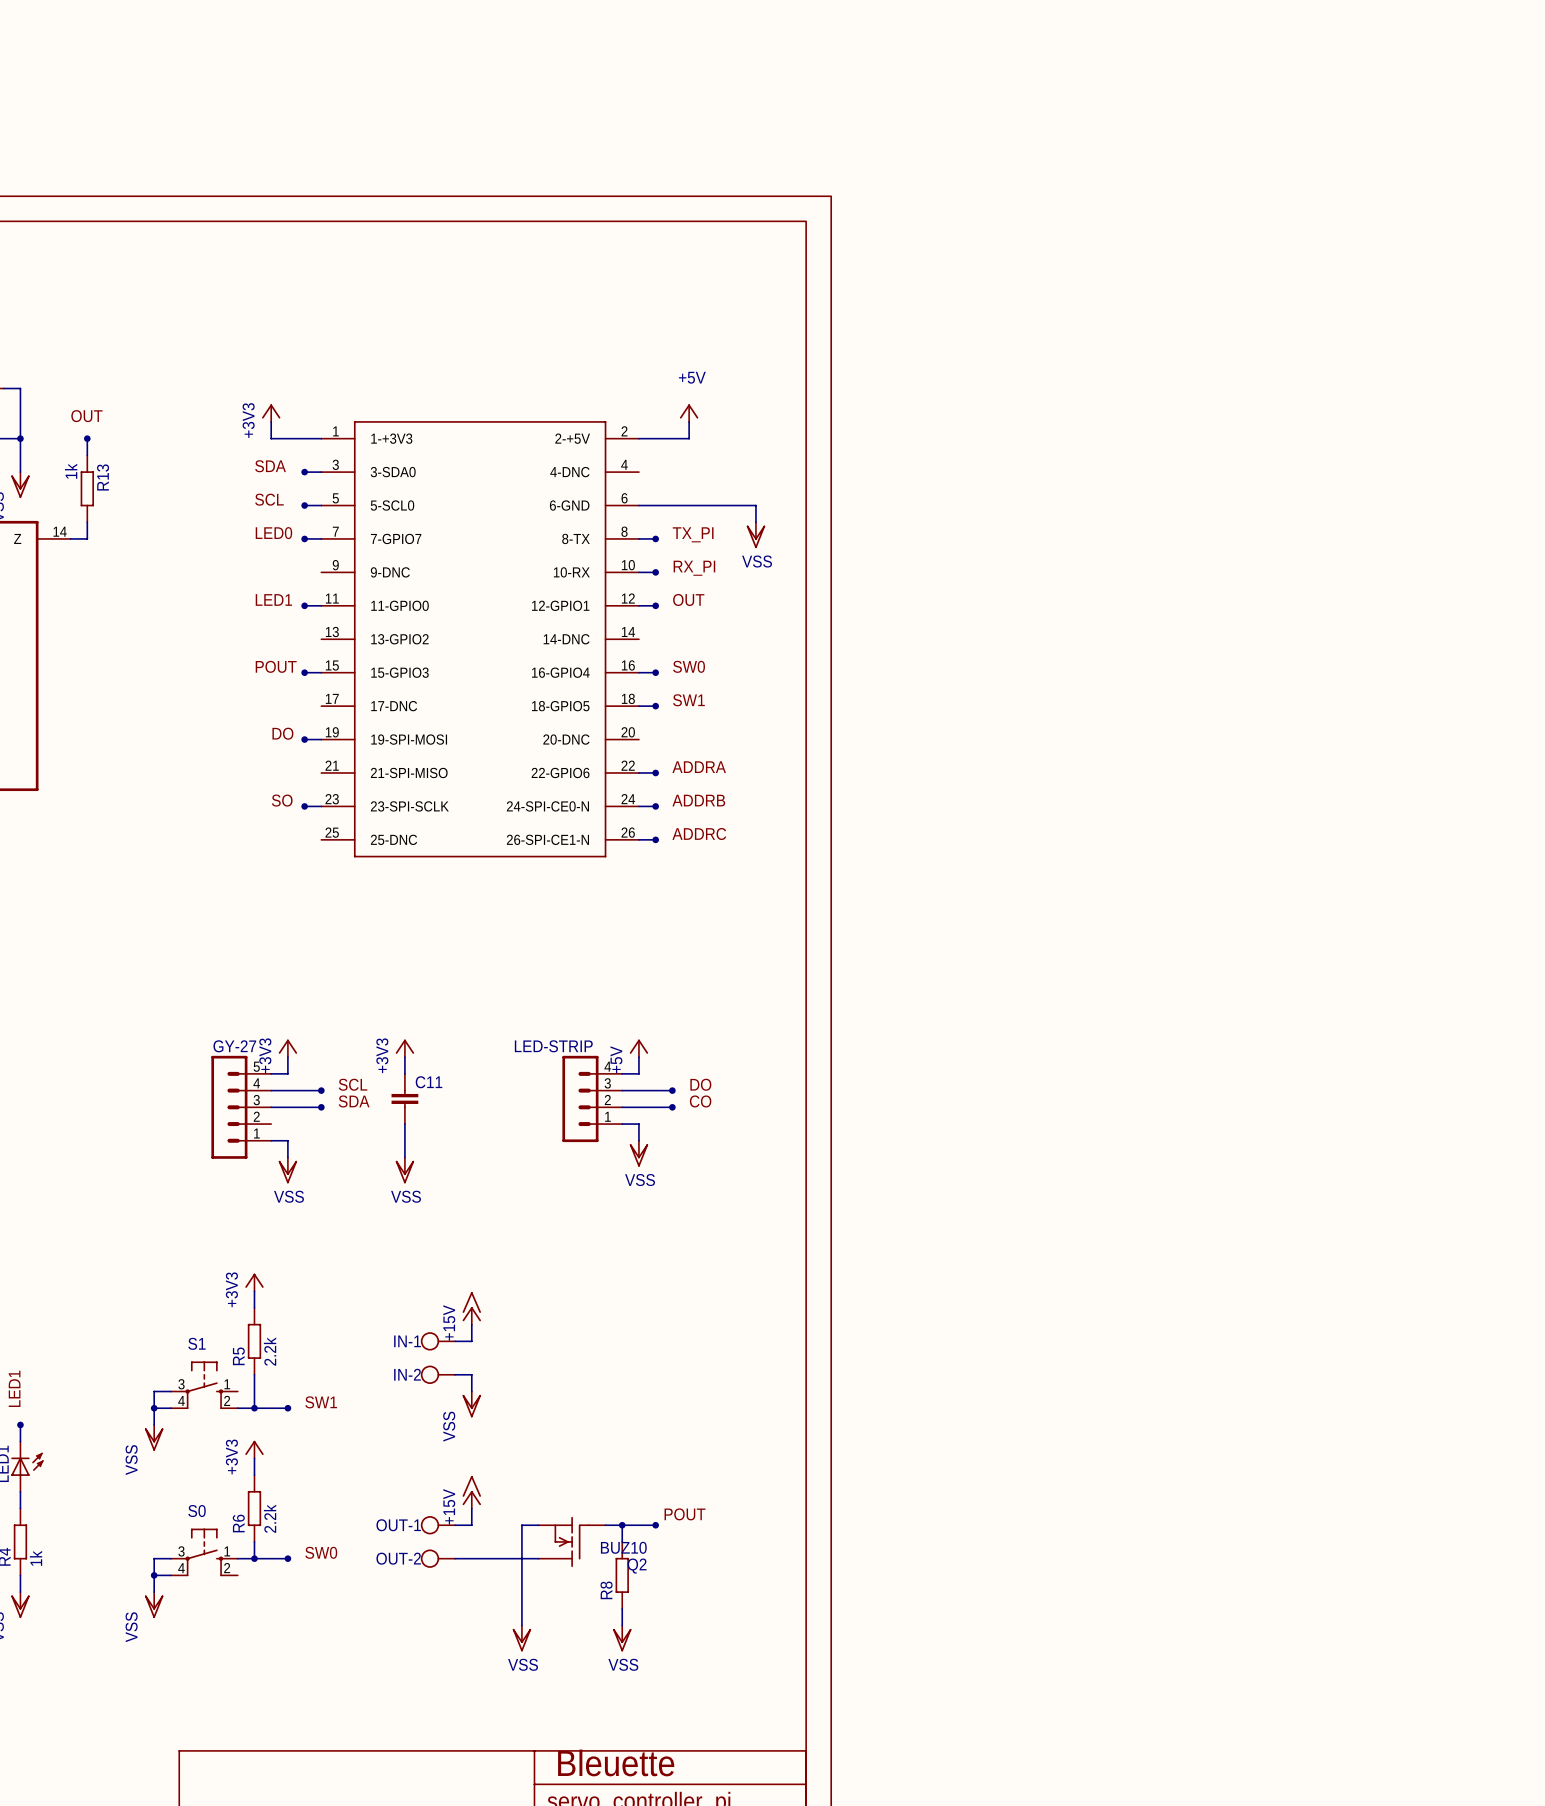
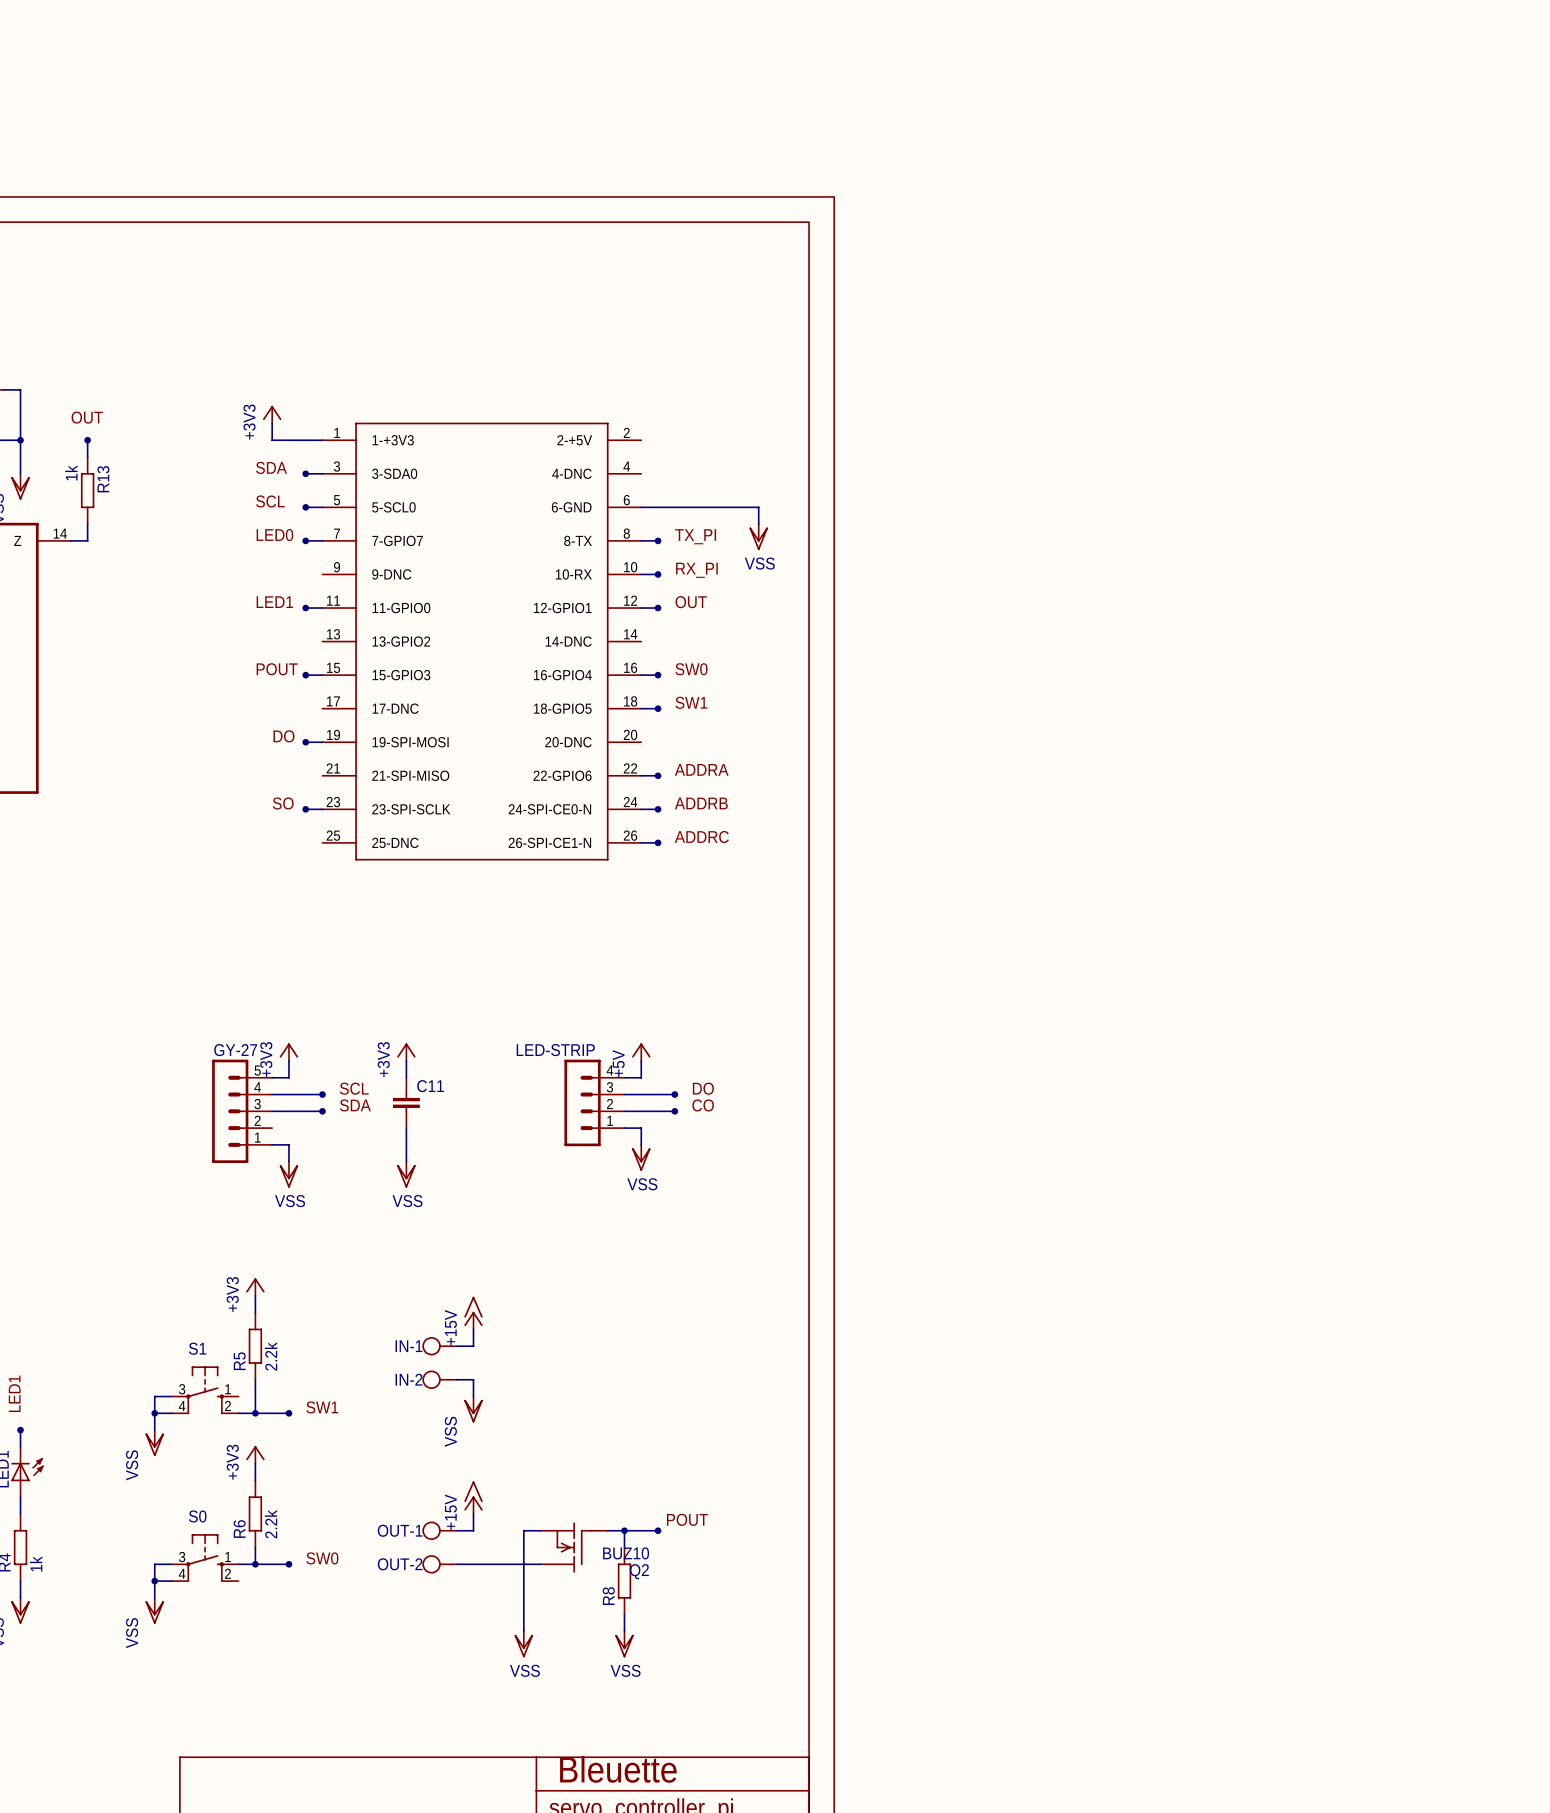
power symbol: +5V (689, 413) -> none
wire: (689, 421) (689, 438) (638, 438) -> none

